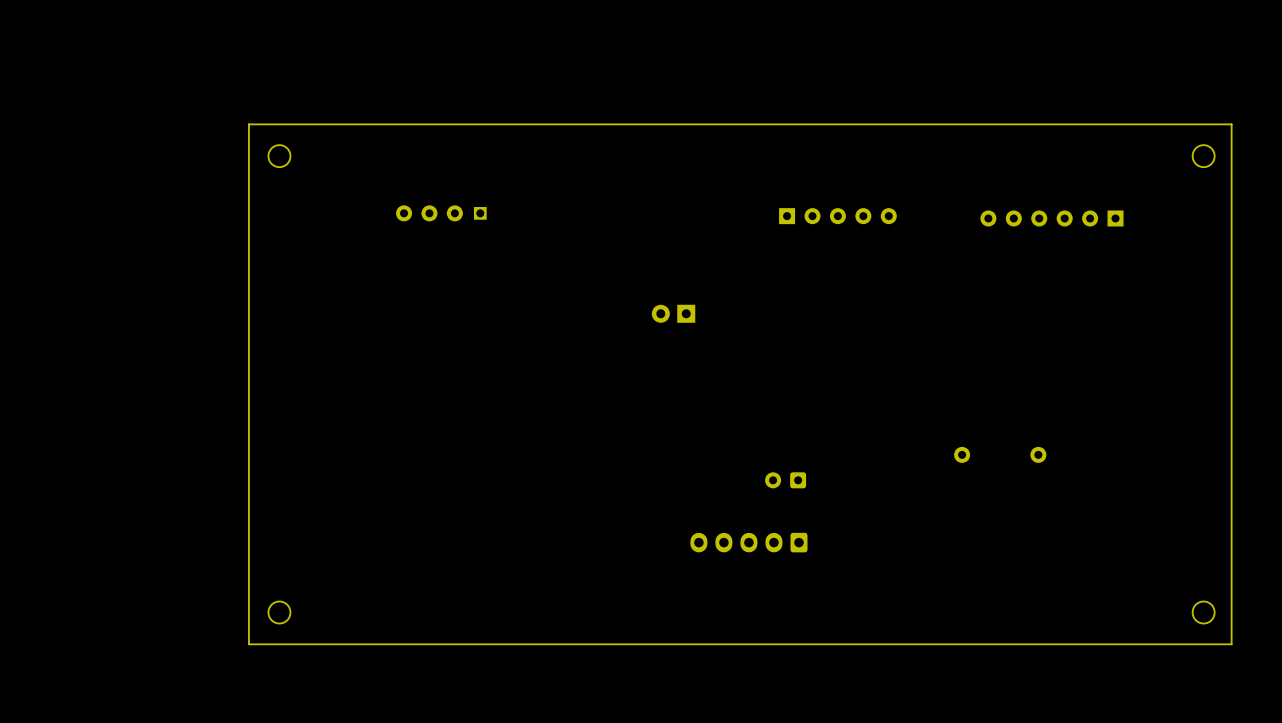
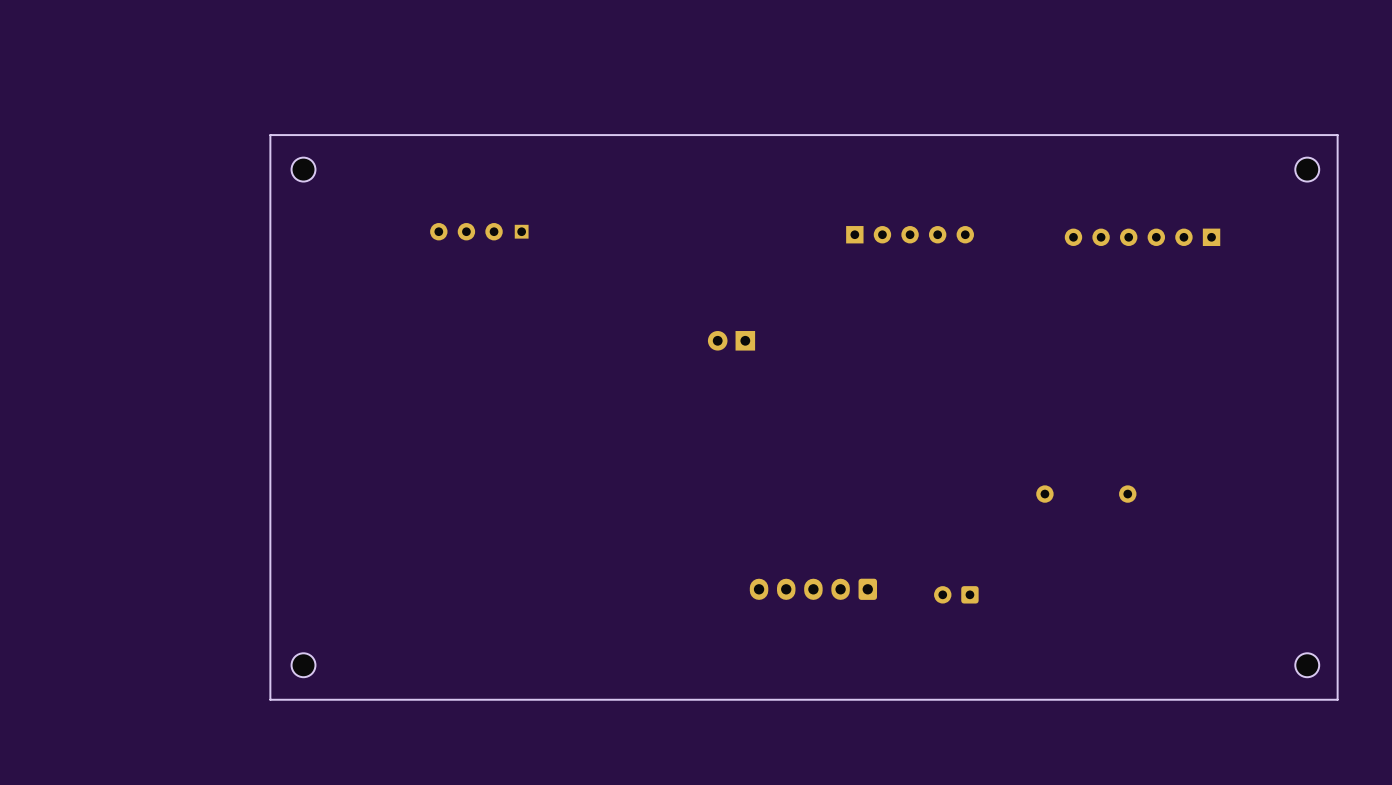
part position: (785, 480) -> (956, 594)

